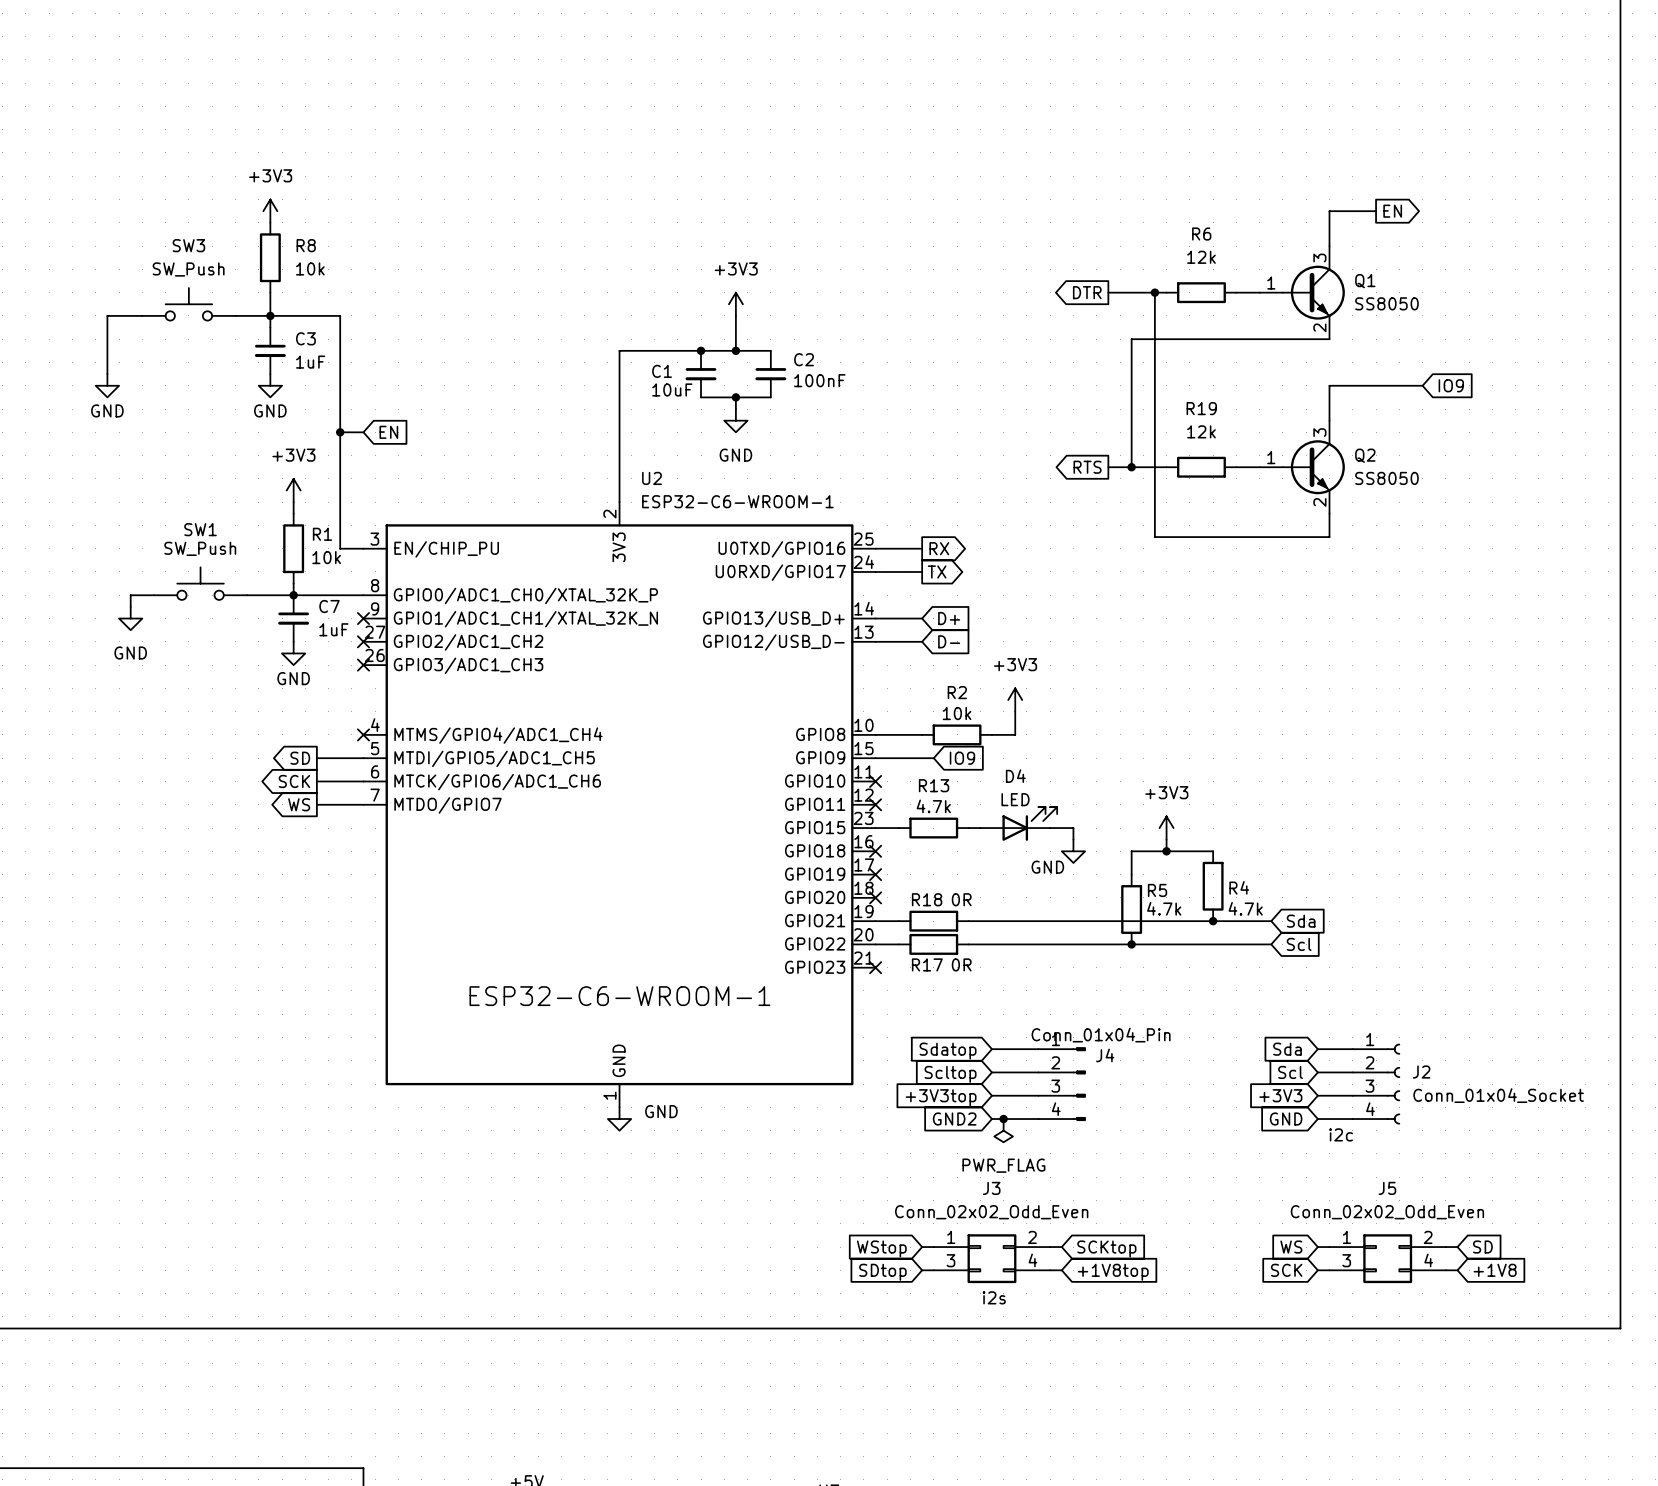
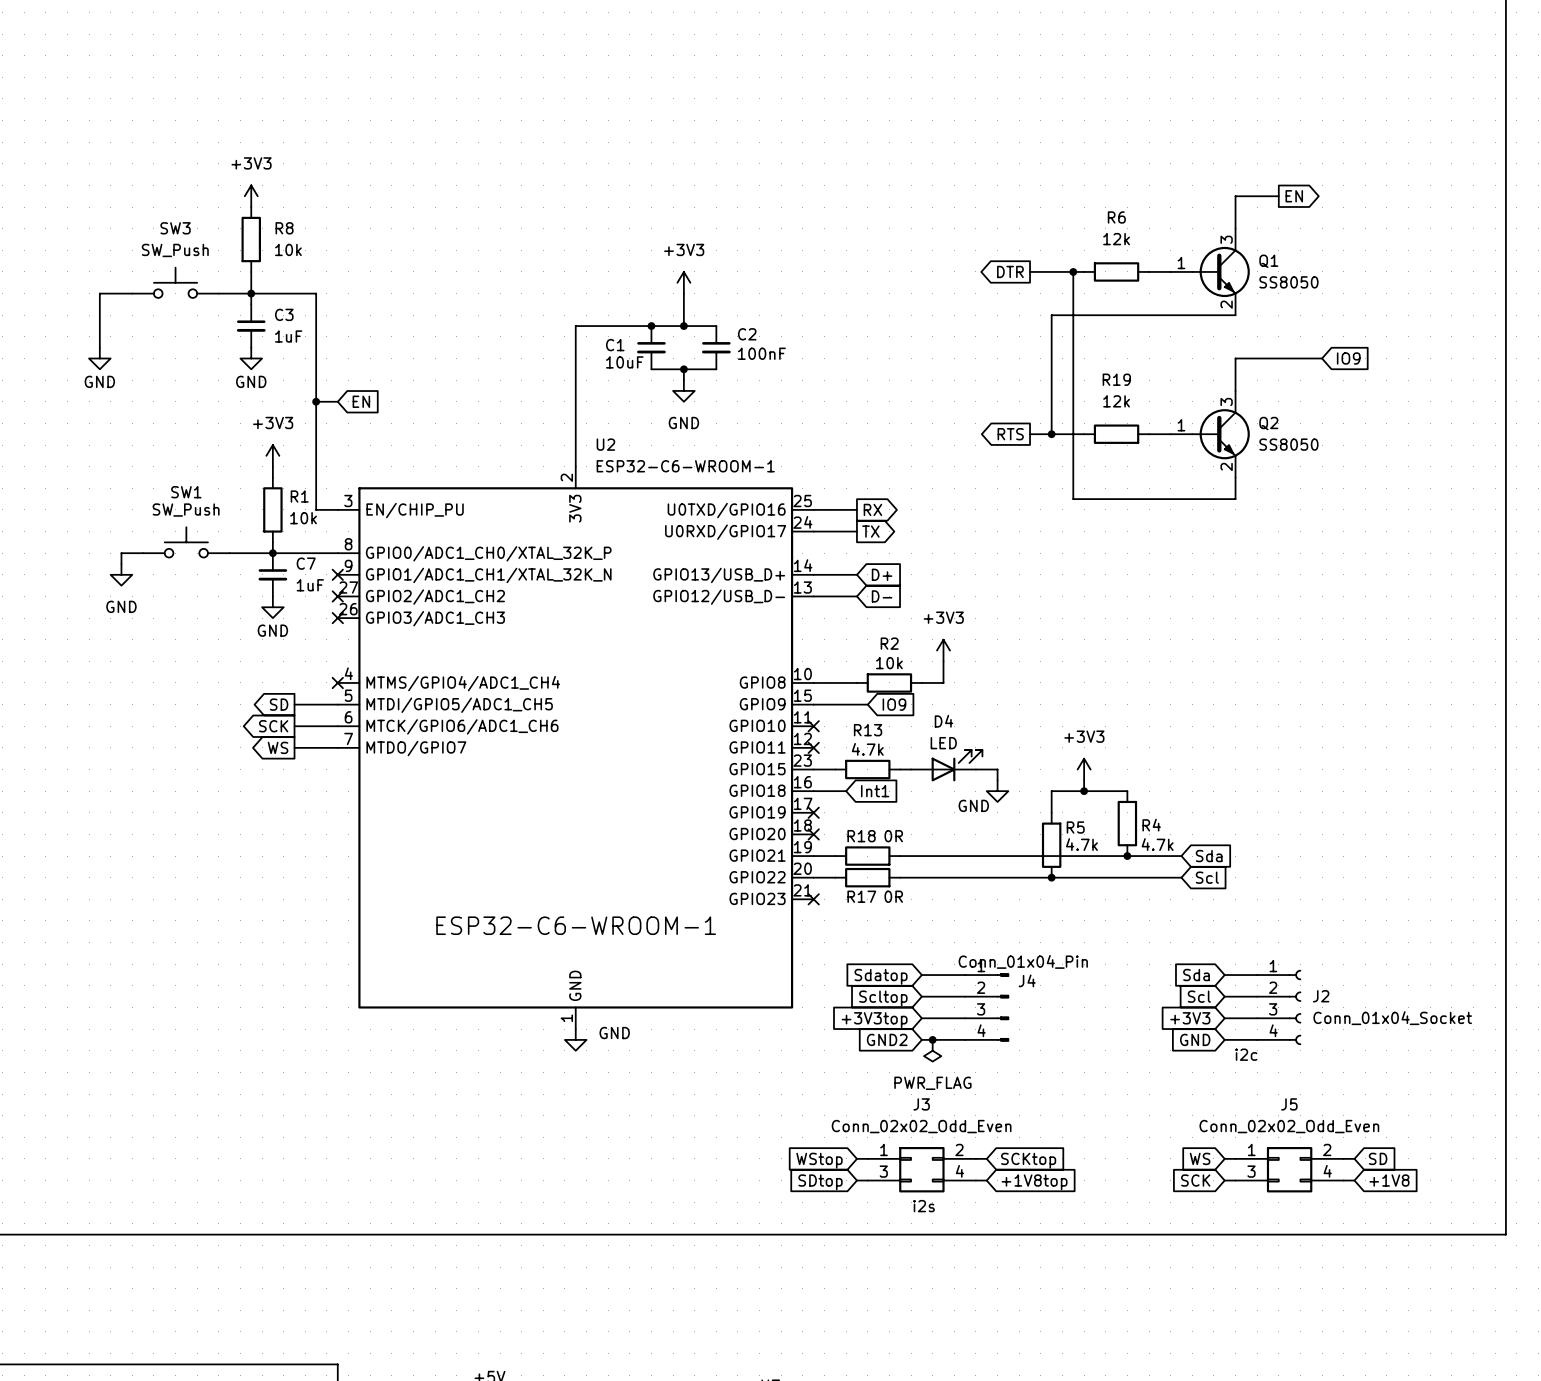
wire: none -> (813, 791) (846, 791)
no-connect mark: (875, 851) -> none
global label: none -> Int1 (875, 791)

